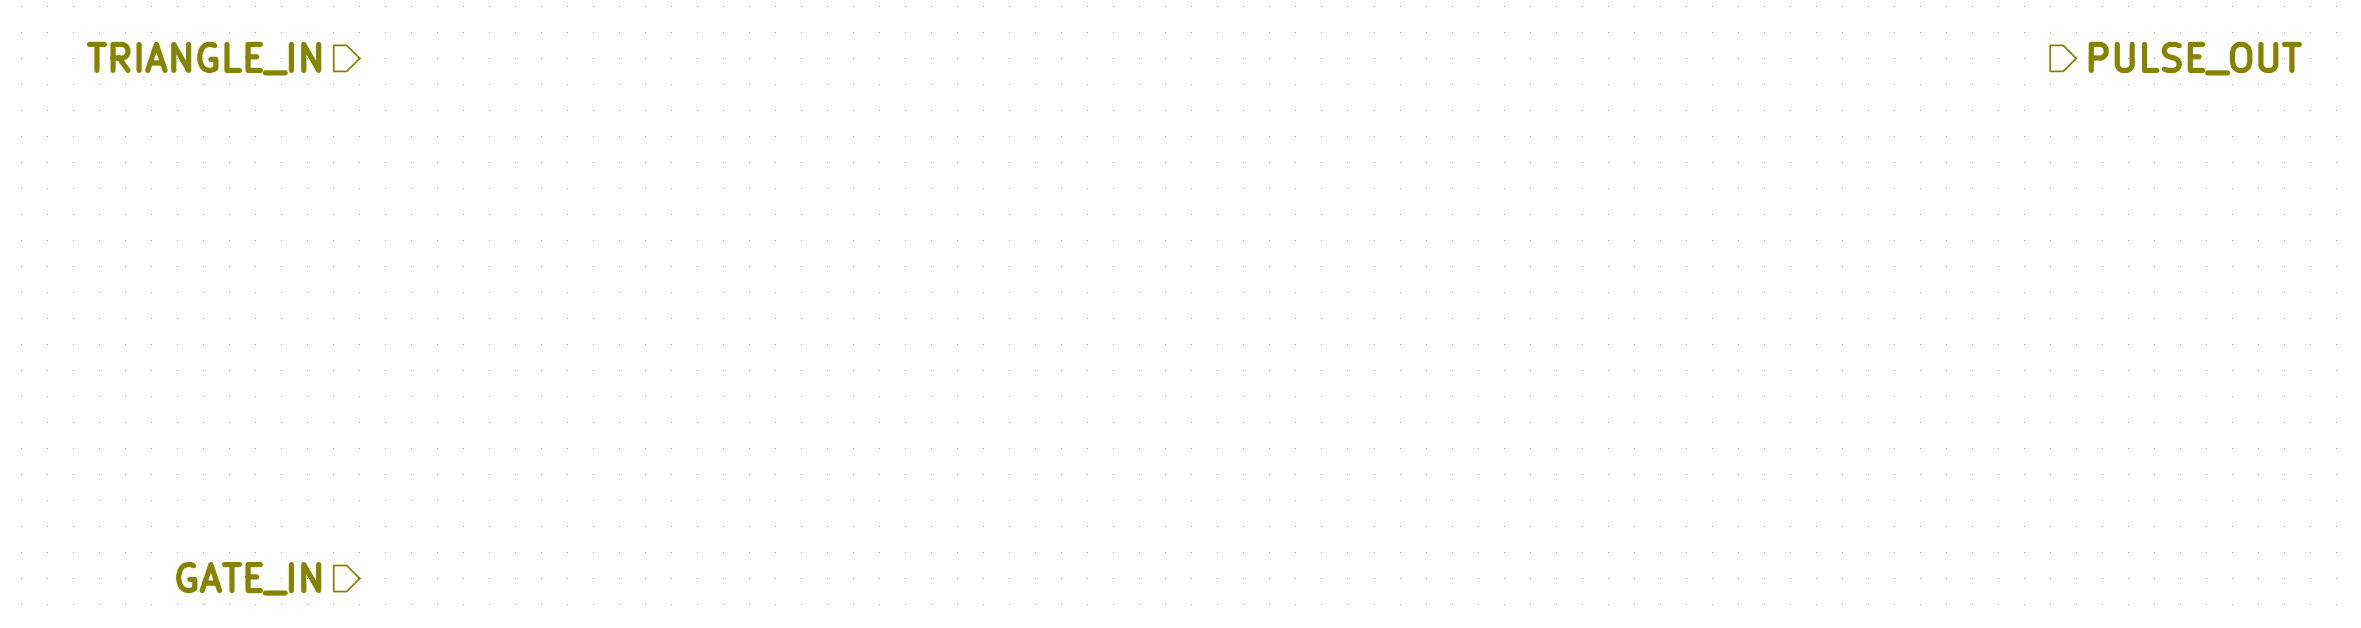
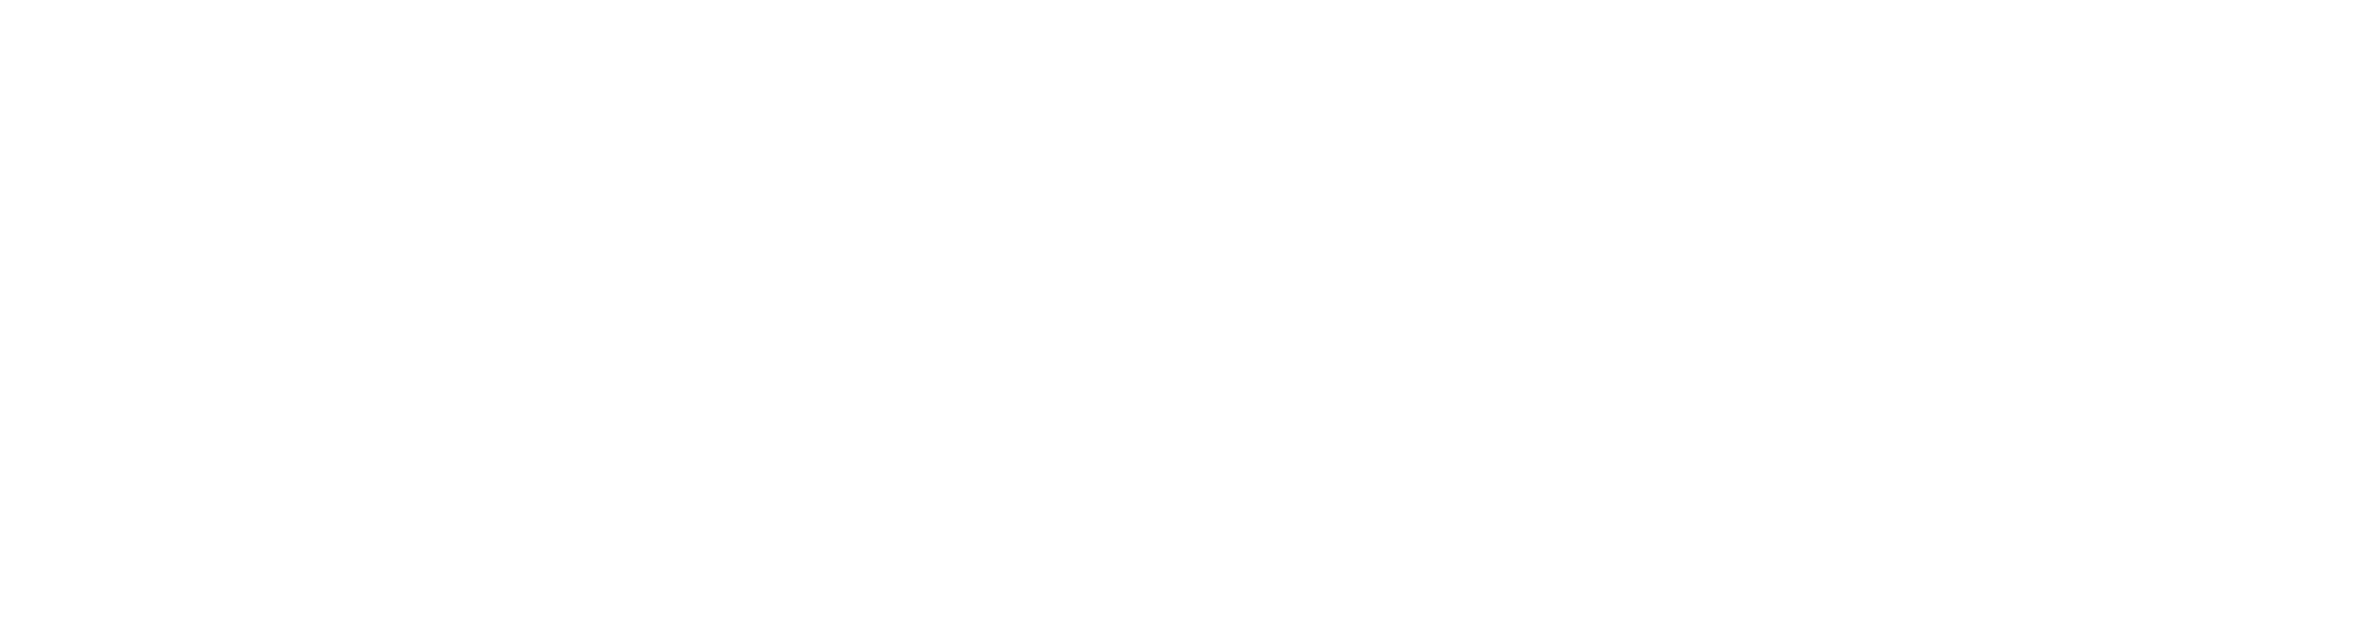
hierarchical label: TRIANGLE_IN (204, 58) -> none
hierarchical label: PULSE_OUT (2195, 58) -> none
hierarchical label: GATE_IN (248, 578) -> none

